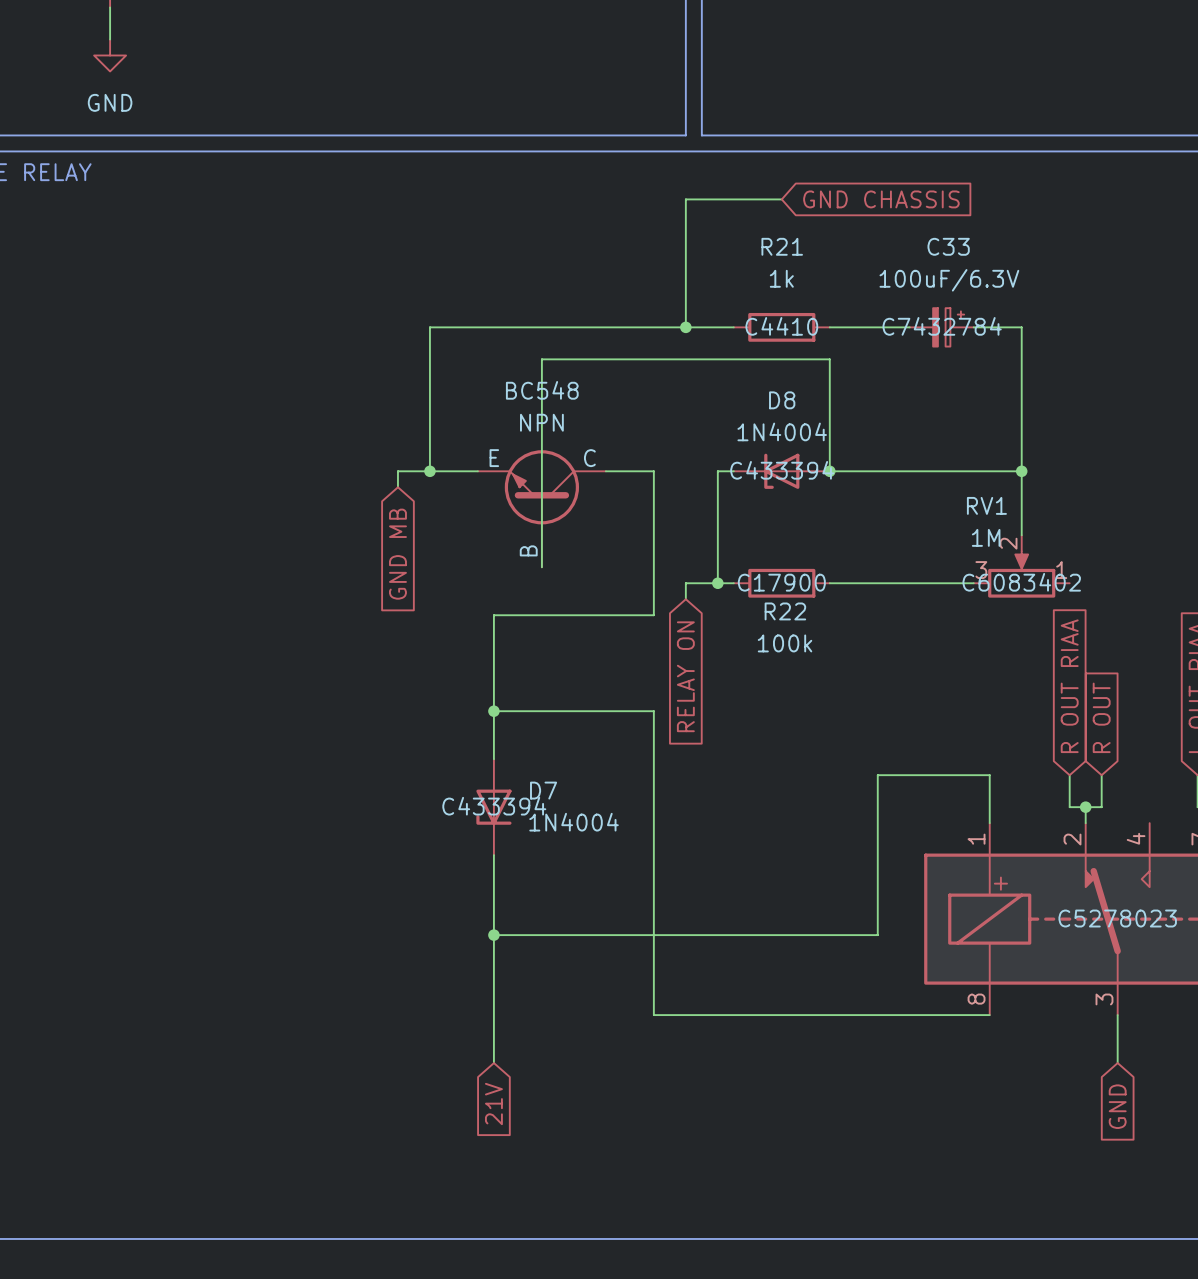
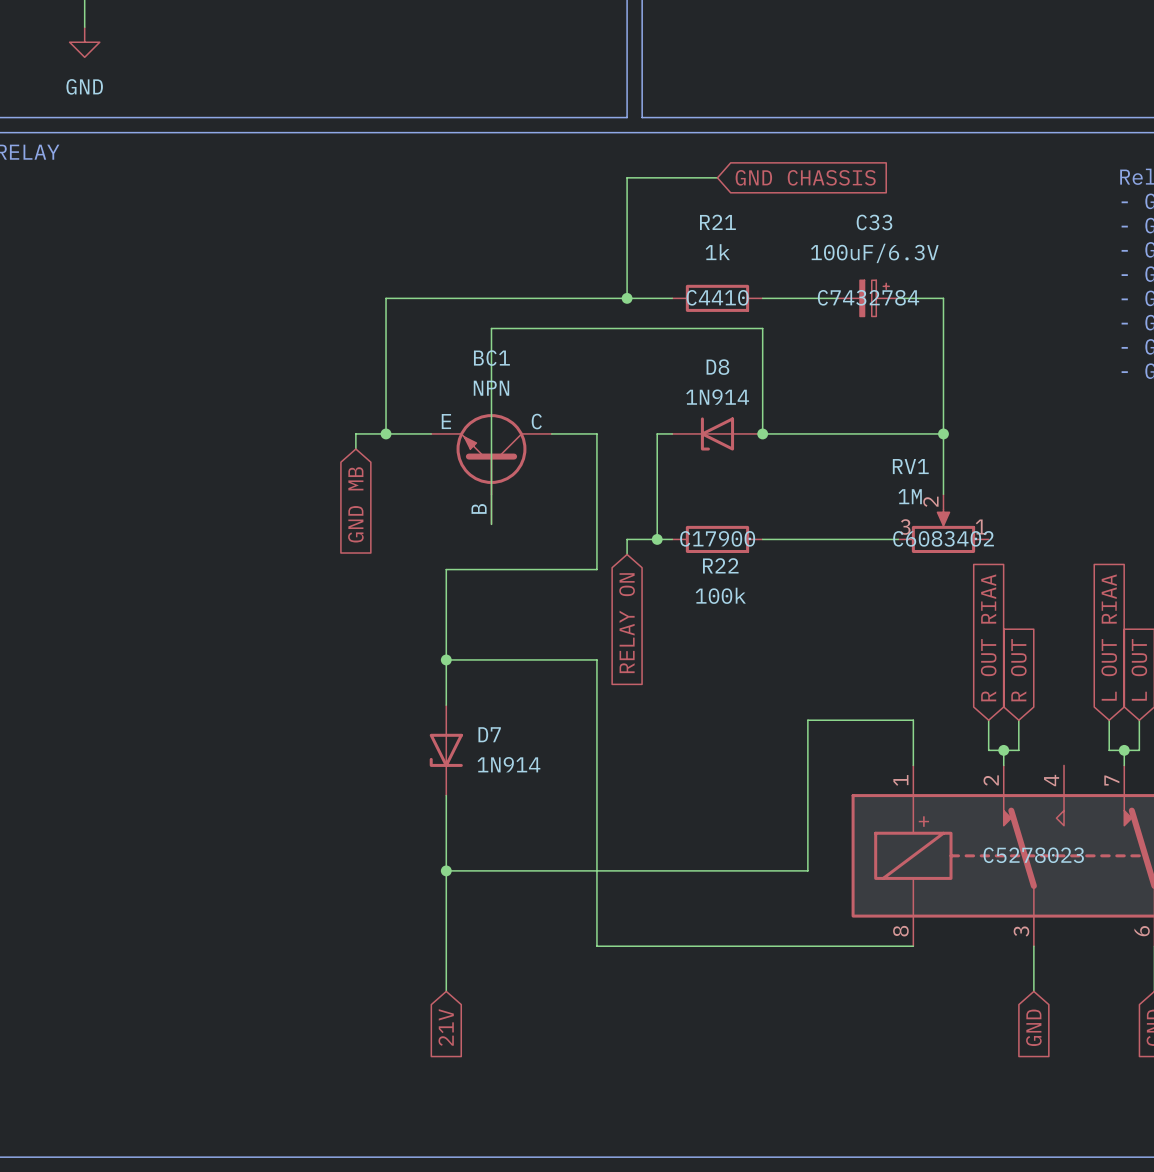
BC548 name: BC548 (542, 390) -> BC1 (491, 358)
D8 value: 1N4004 (782, 431) -> 1N914 (717, 397)
D8 text: C433394 (782, 470) -> none
D7 text: C433394 (494, 806) -> none
D7 value: 1N4004 (574, 822) -> 1N914 (508, 764)

